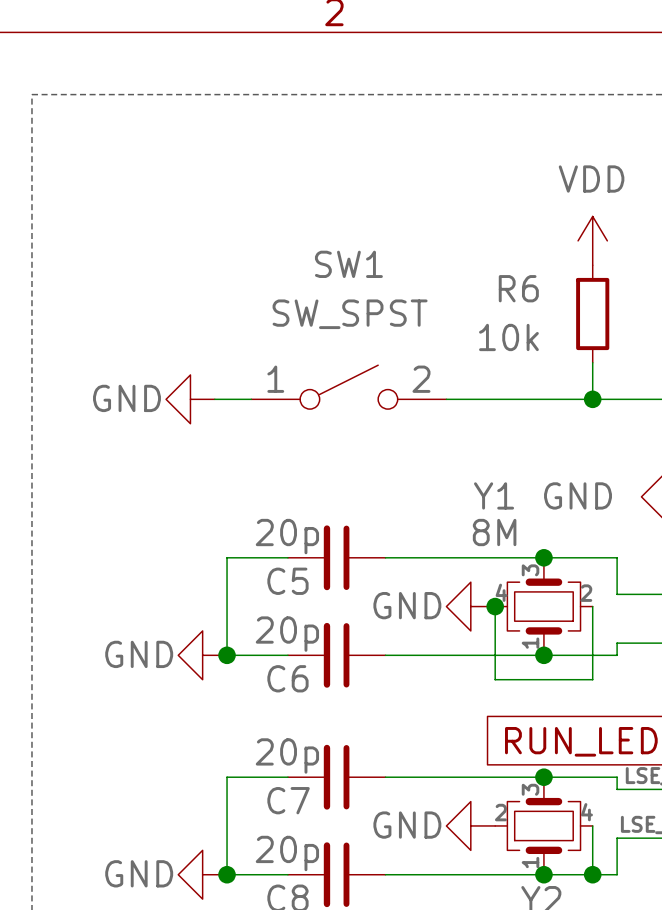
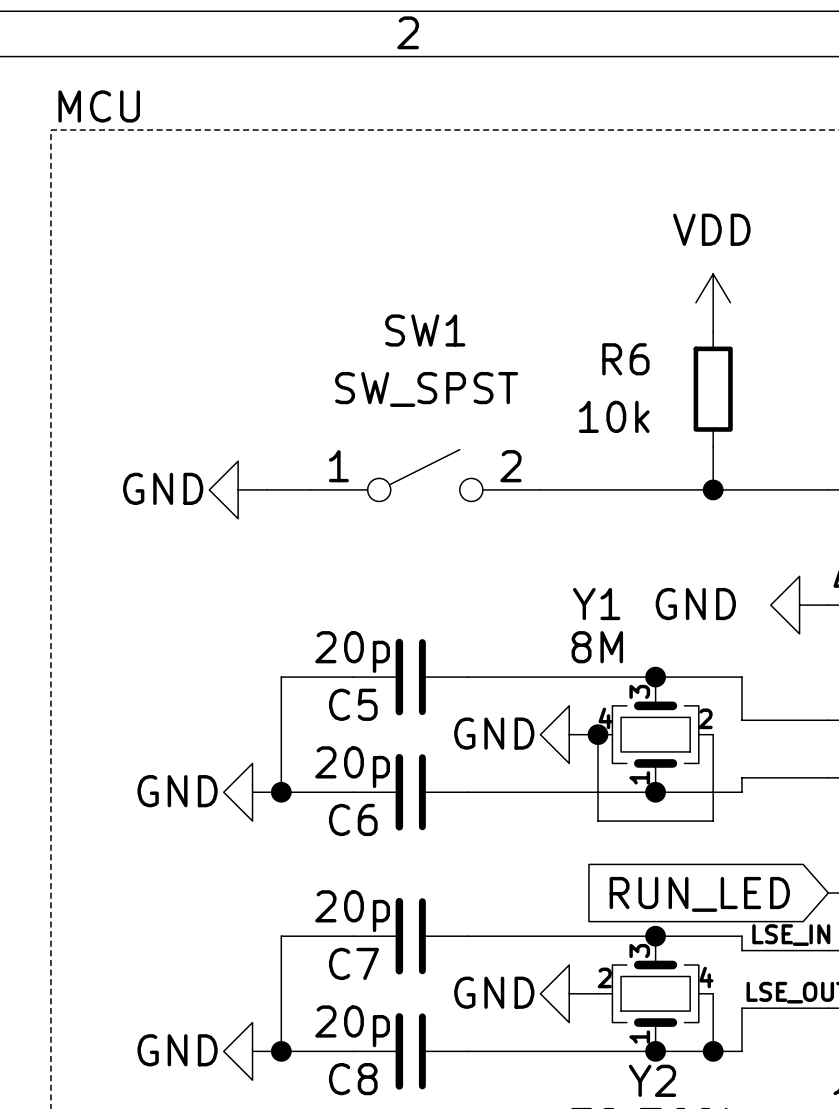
text: none -> MCU (99, 106)

